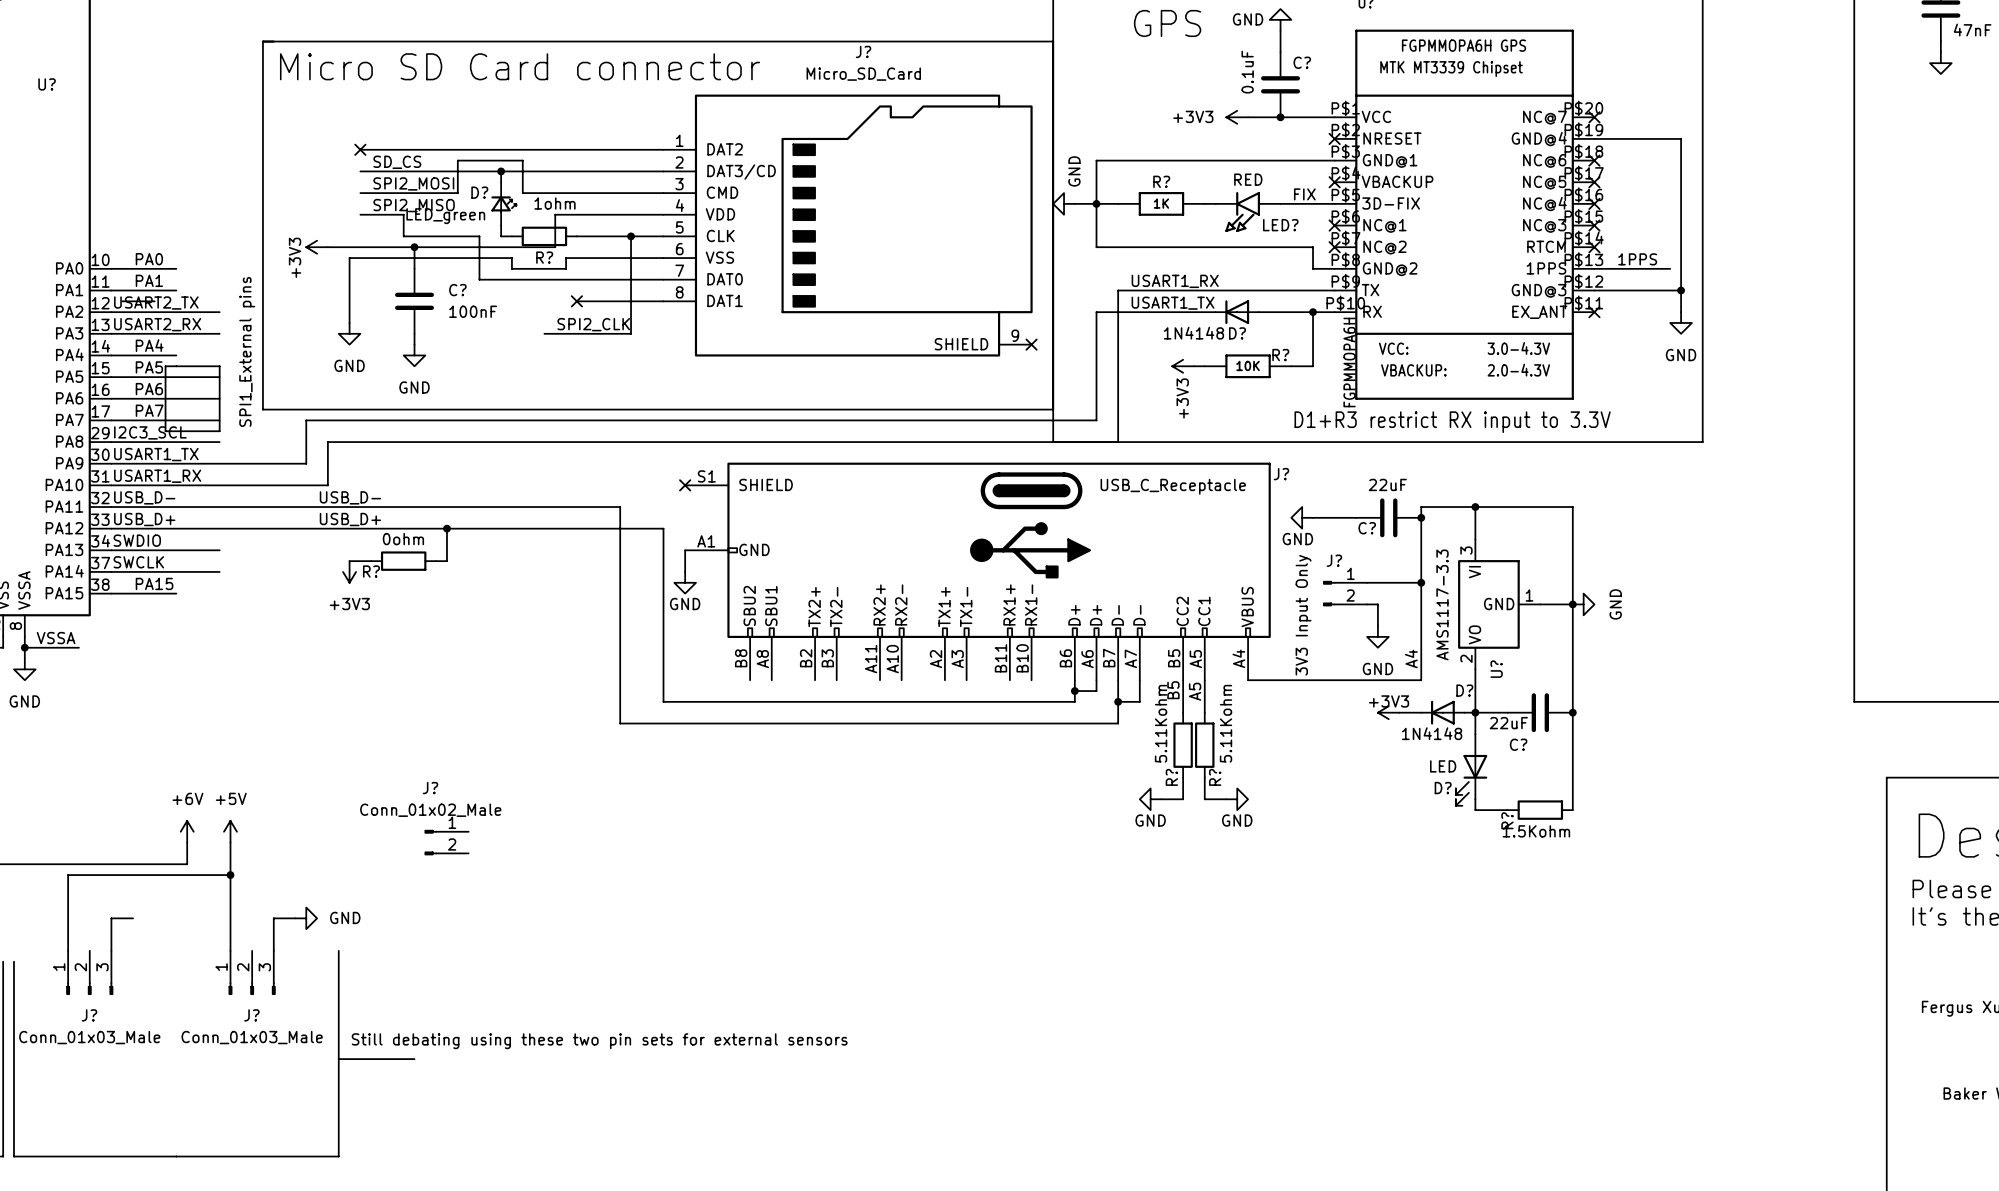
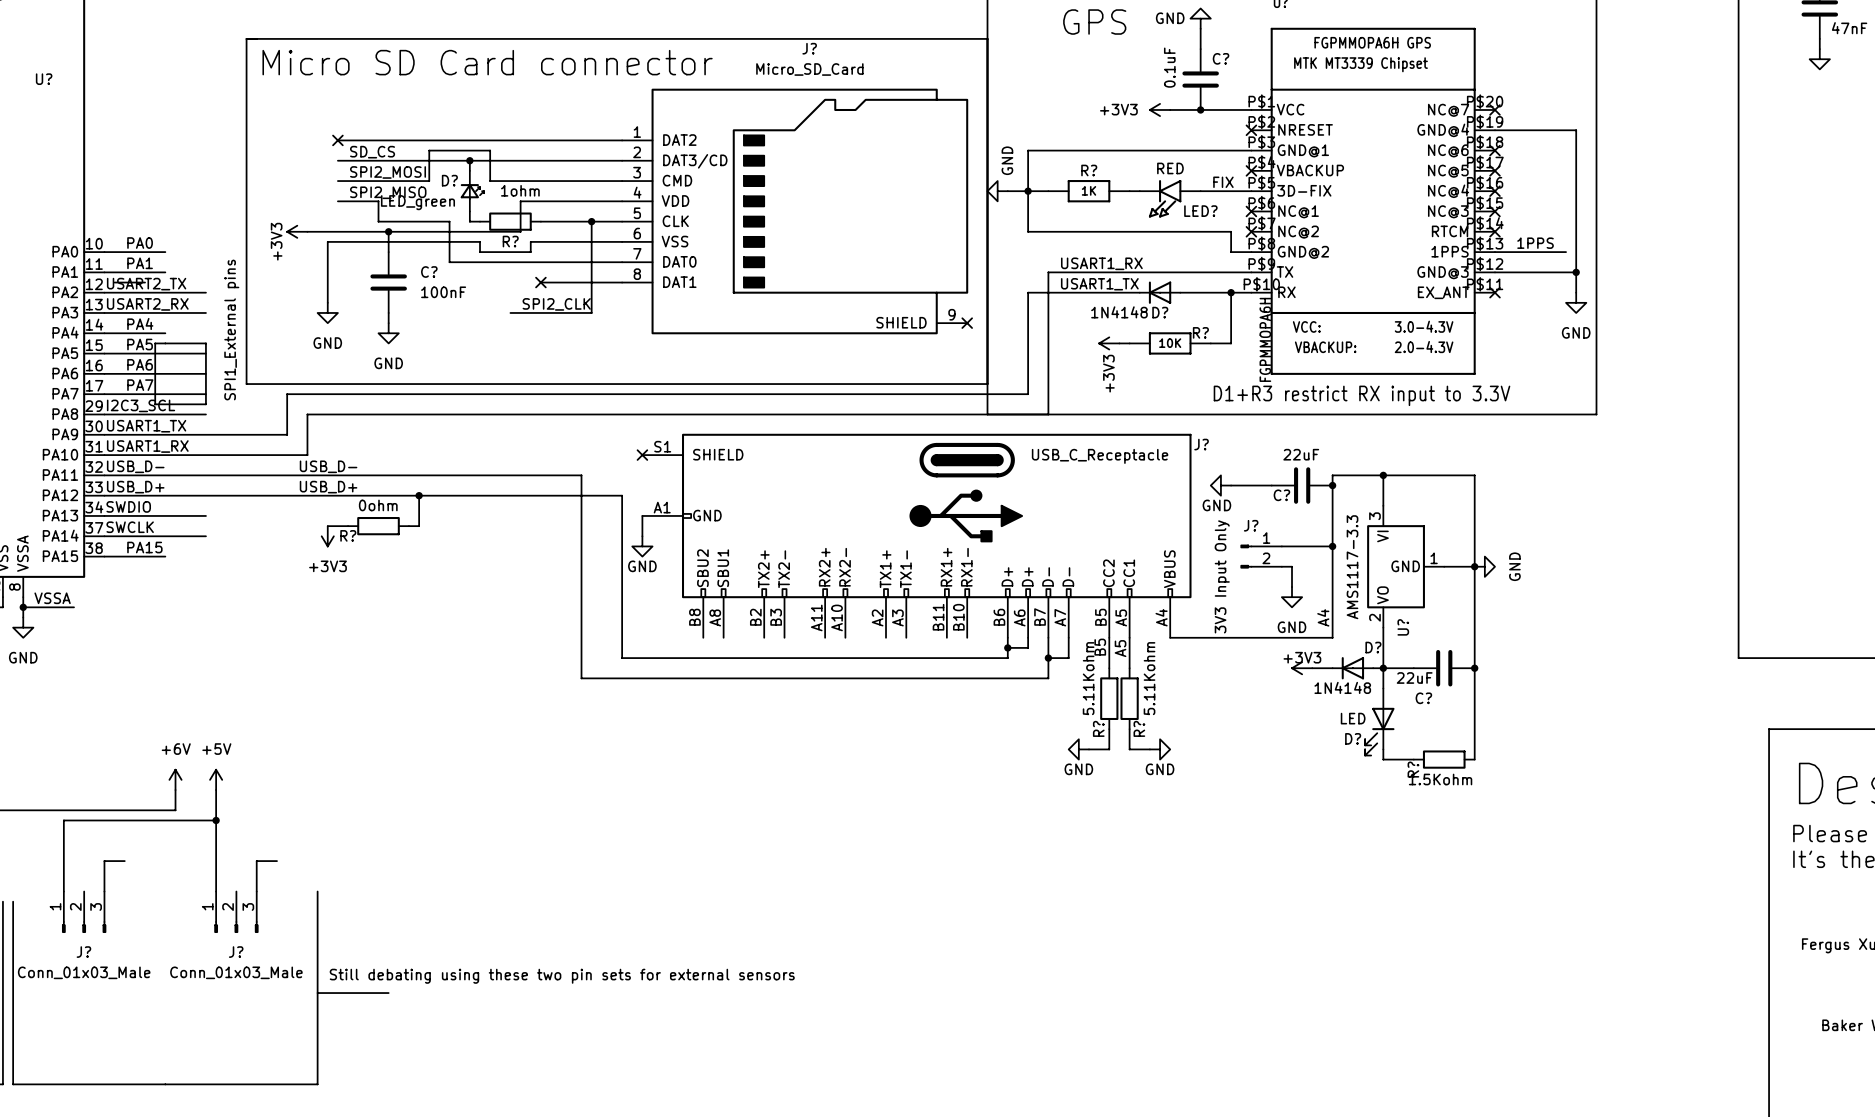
J?: Conn_01x02_Male (446, 842) -> none
power symbol: GND (306, 918) -> none

